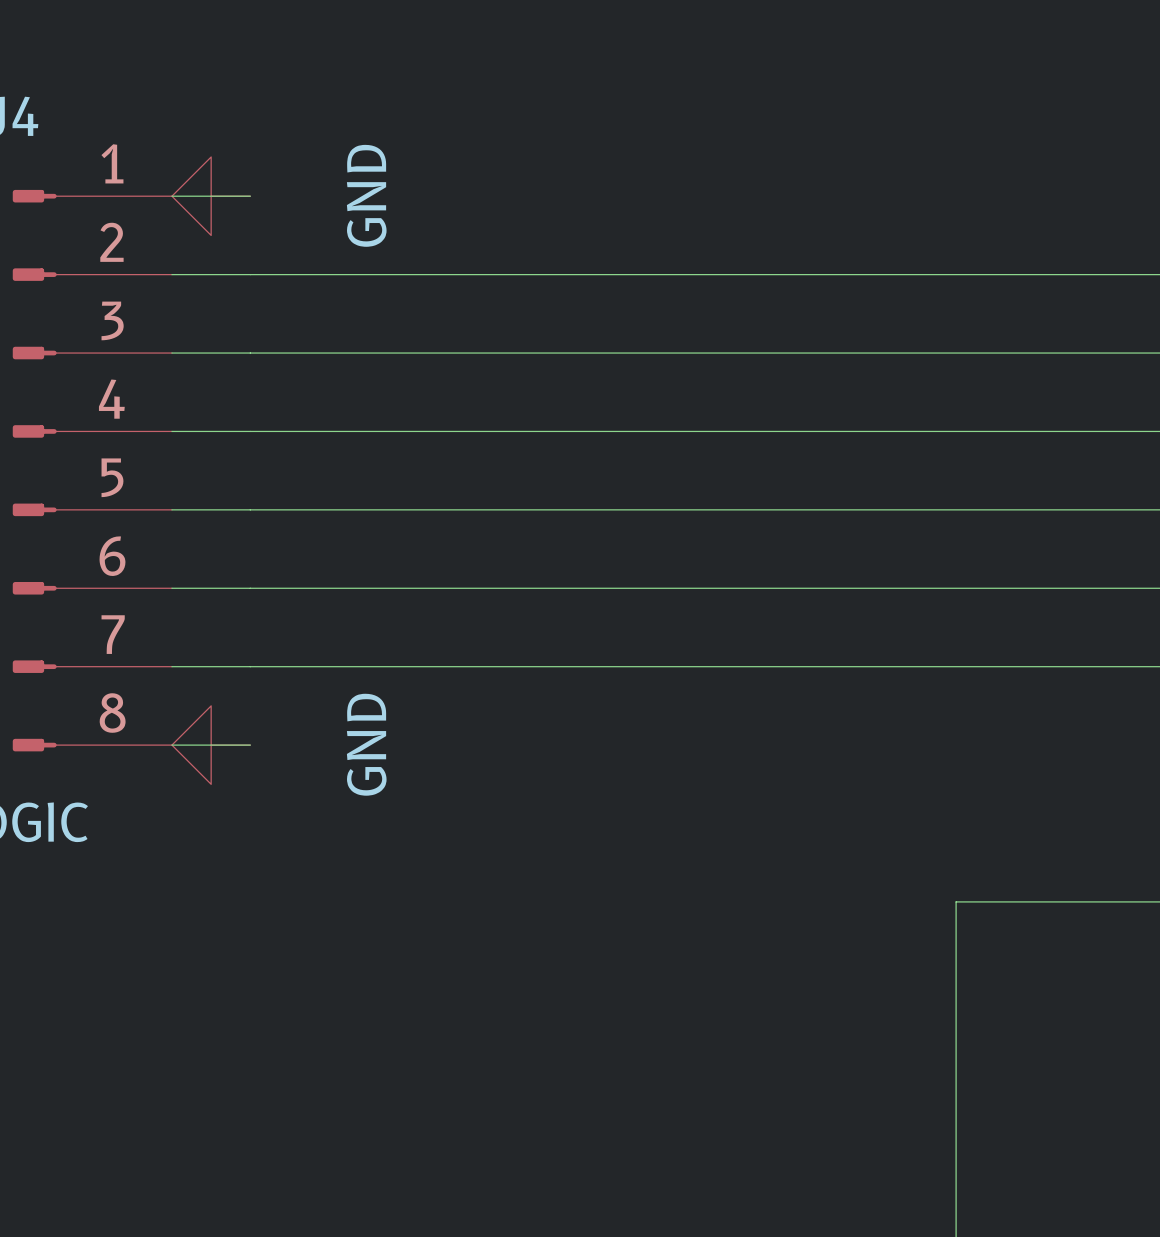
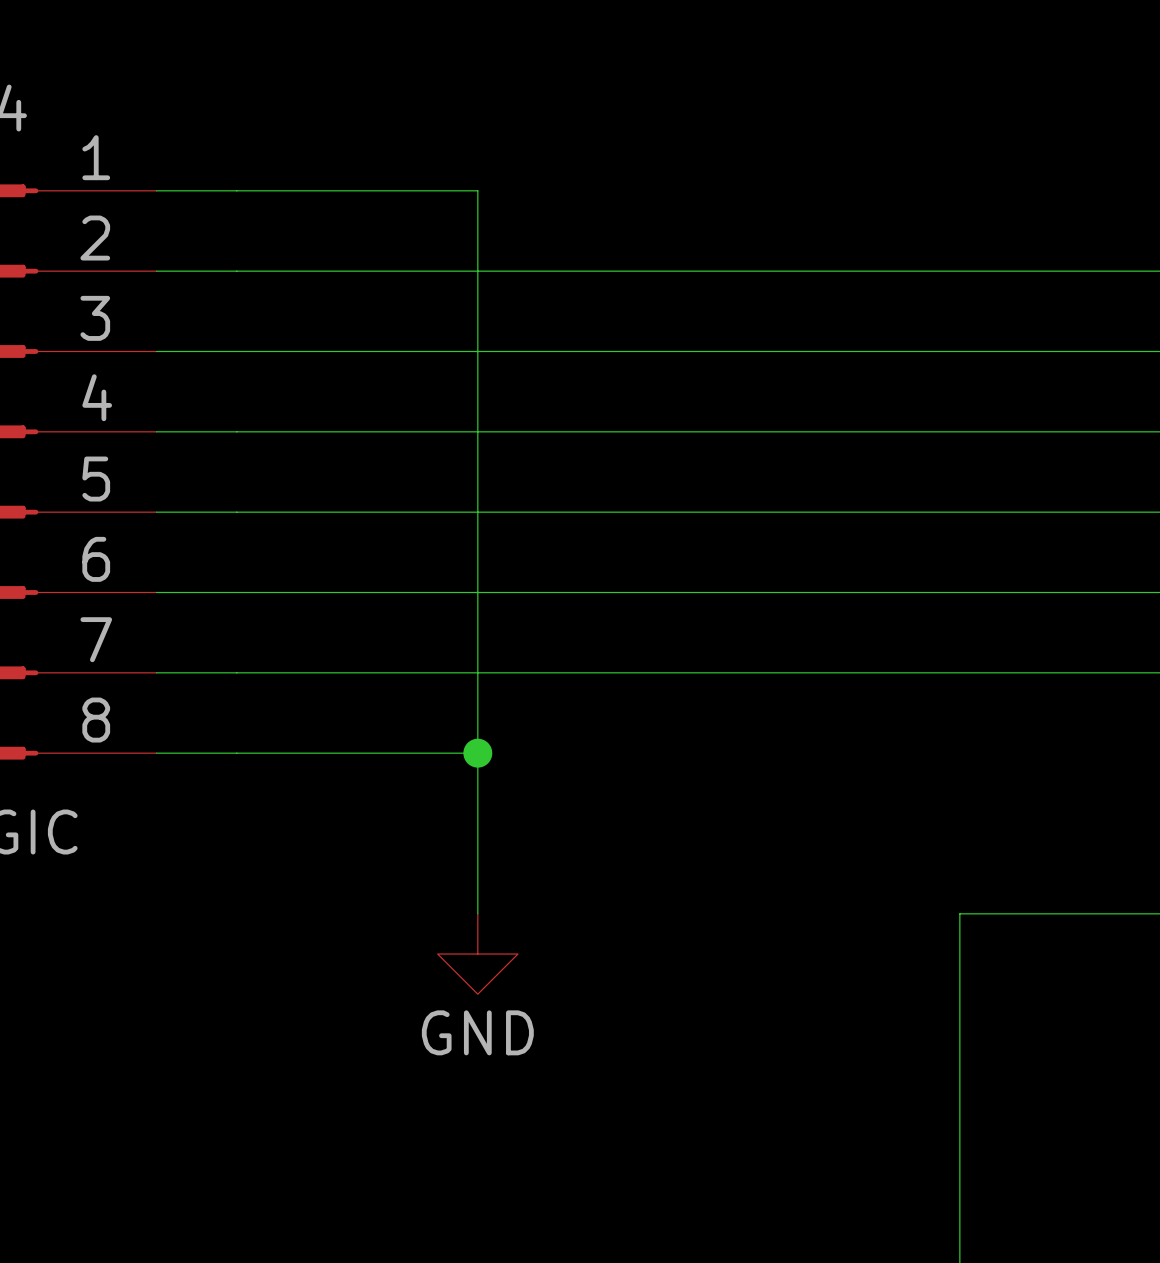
power symbol: GND (211, 196) -> none
wire: none -> (236, 190) (477, 190) (477, 913)
power symbol text position: GND (366, 744) -> GND (477, 1032)
power symbol rotation: 0° (211, 745) -> 90° counterclockwise (477, 954)
power symbol position: GND (211, 745) -> GND (477, 954)
wire: none -> (236, 753) (477, 753)
junction: none -> (477, 753)

